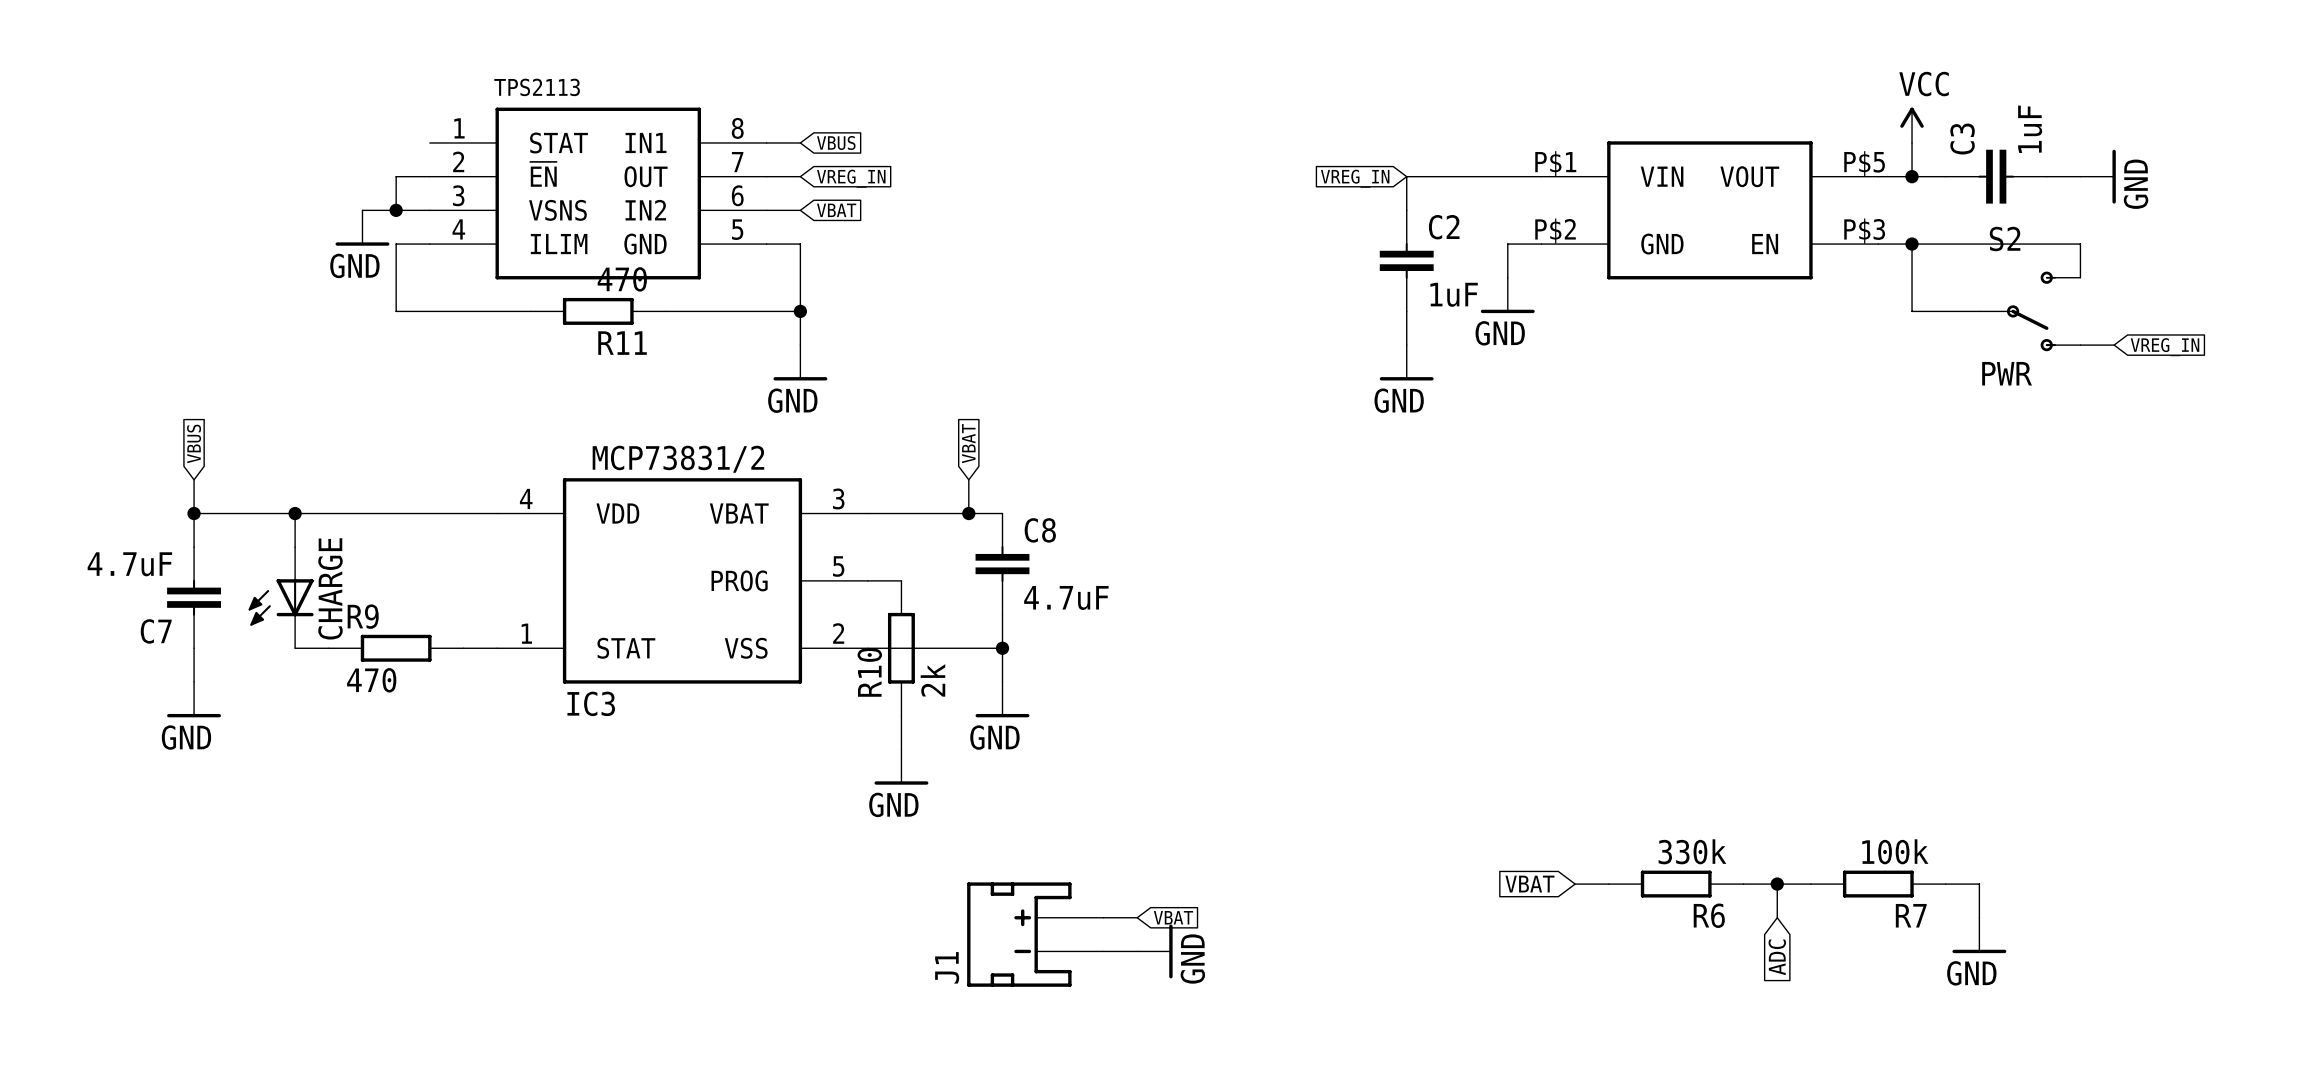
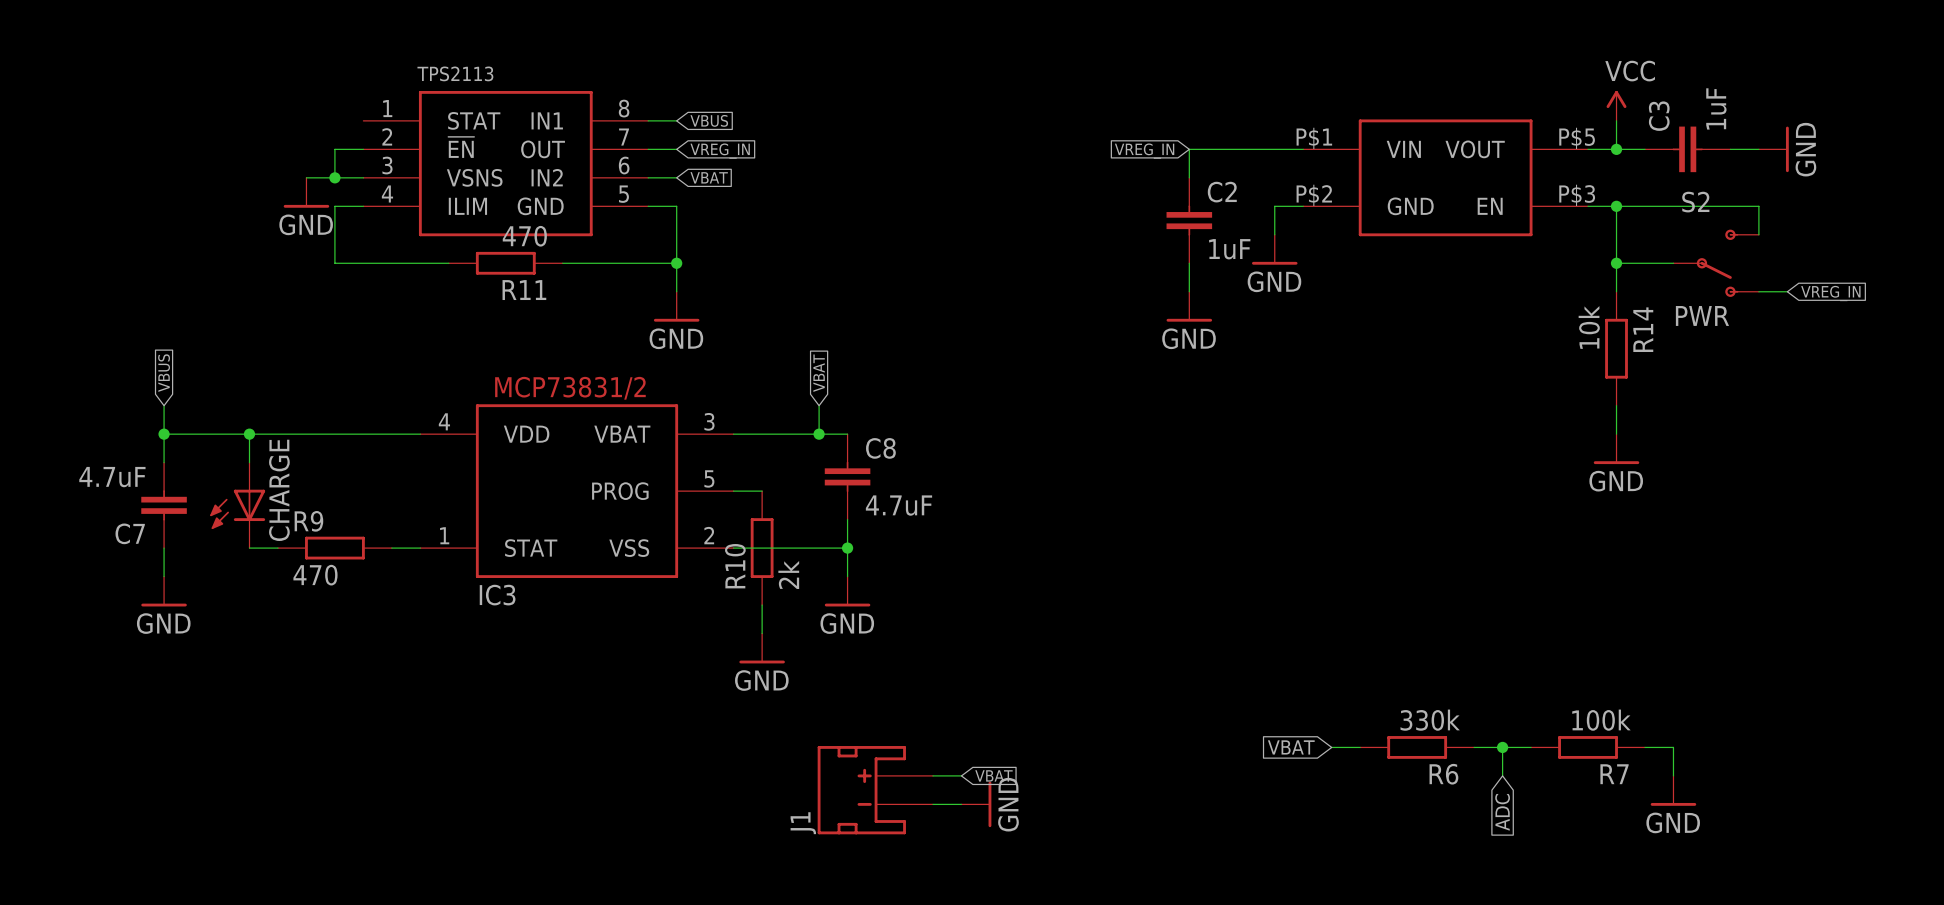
wire: none -> (1616, 263) (1616, 291)
junction: none -> (1616, 263)
R14: none -> 10k (1616, 348)
wire: none -> (1616, 405) (1616, 434)
power symbol: none -> GND (1616, 449)

